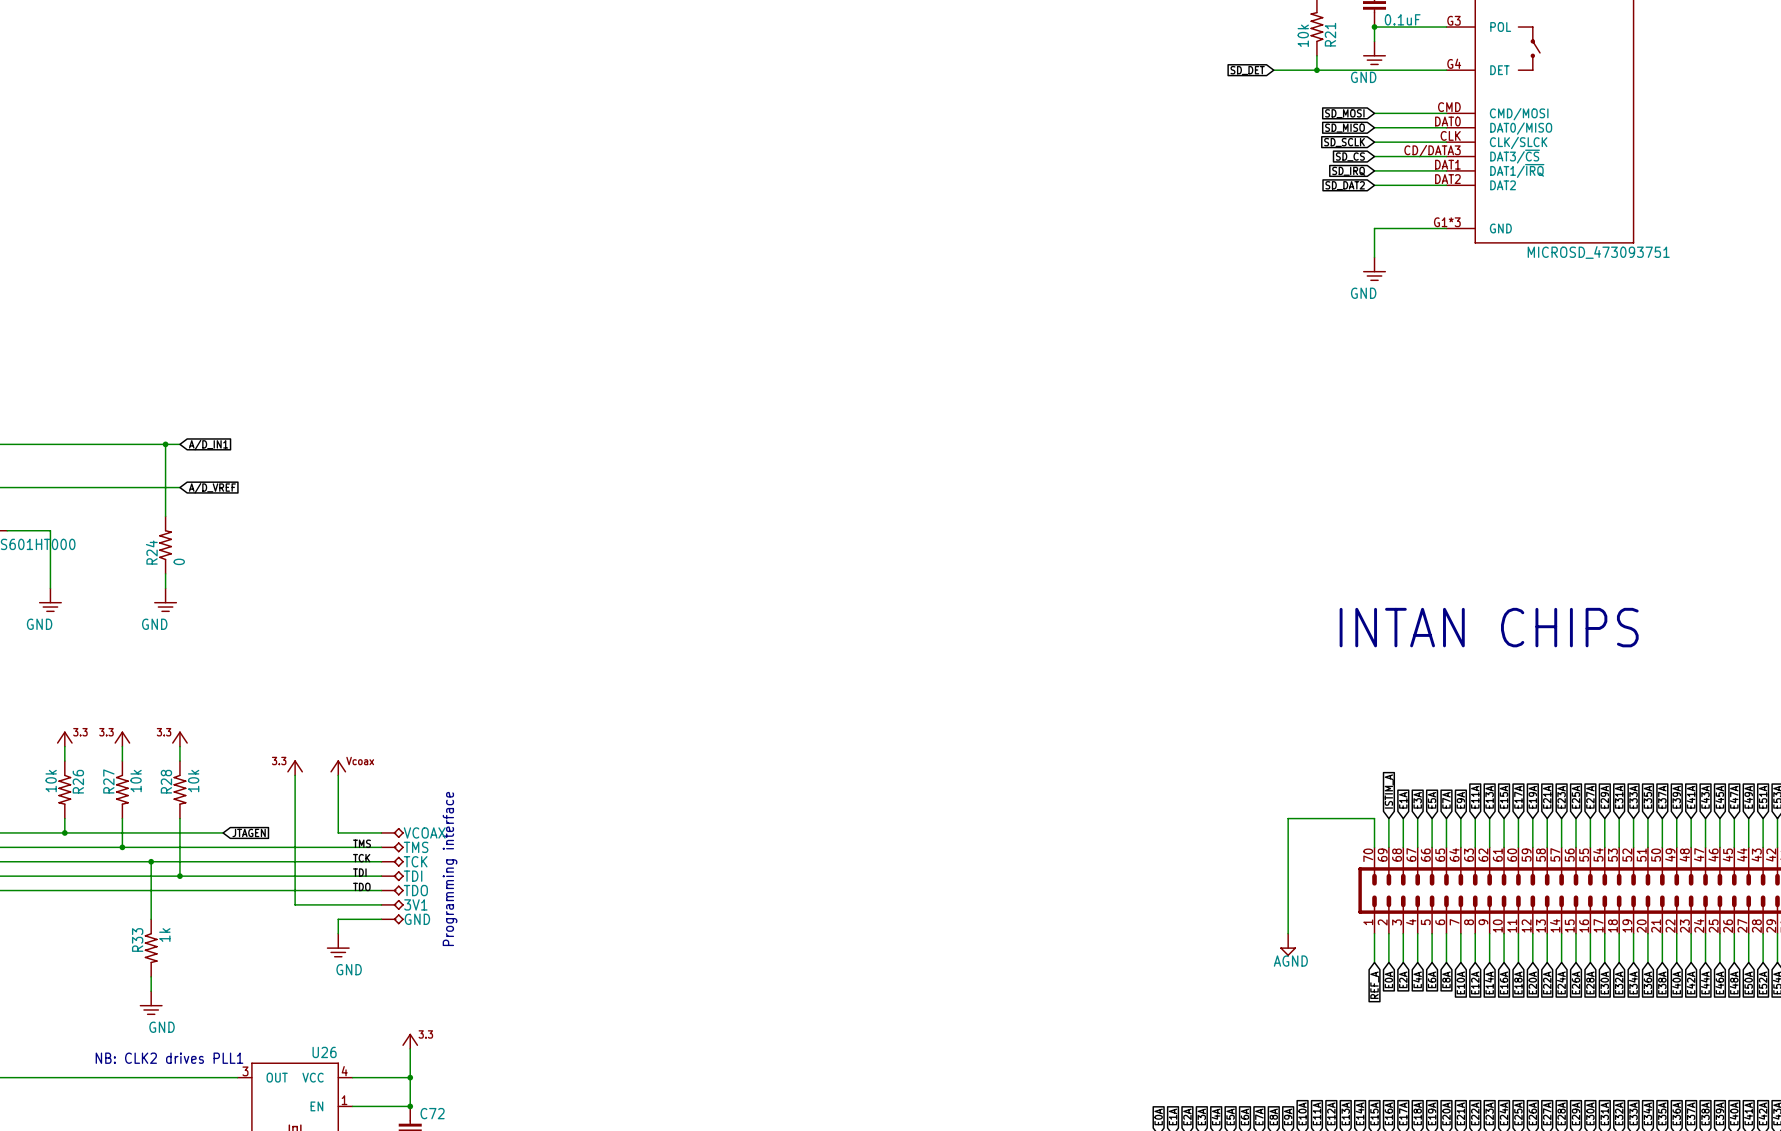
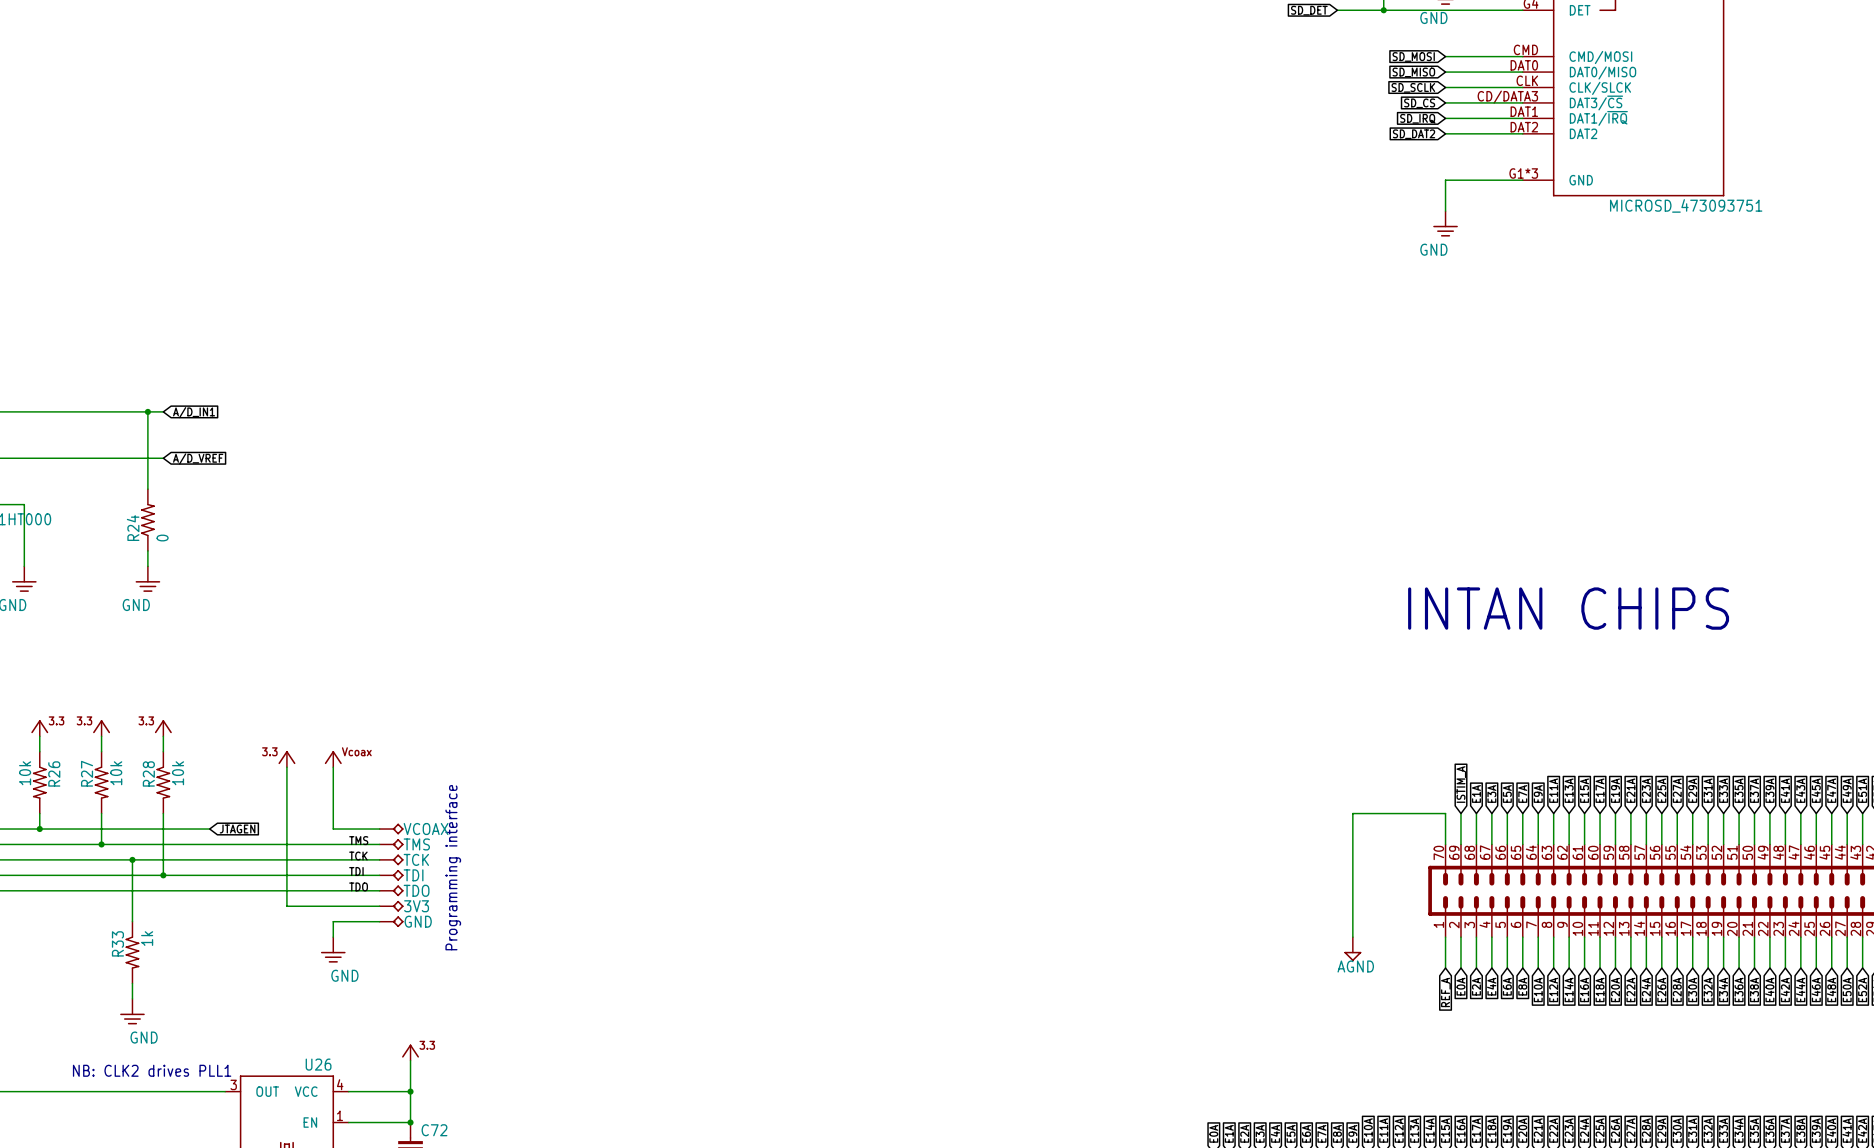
3V1 name: 3V1 (415, 904) -> 3V3 (416, 906)

